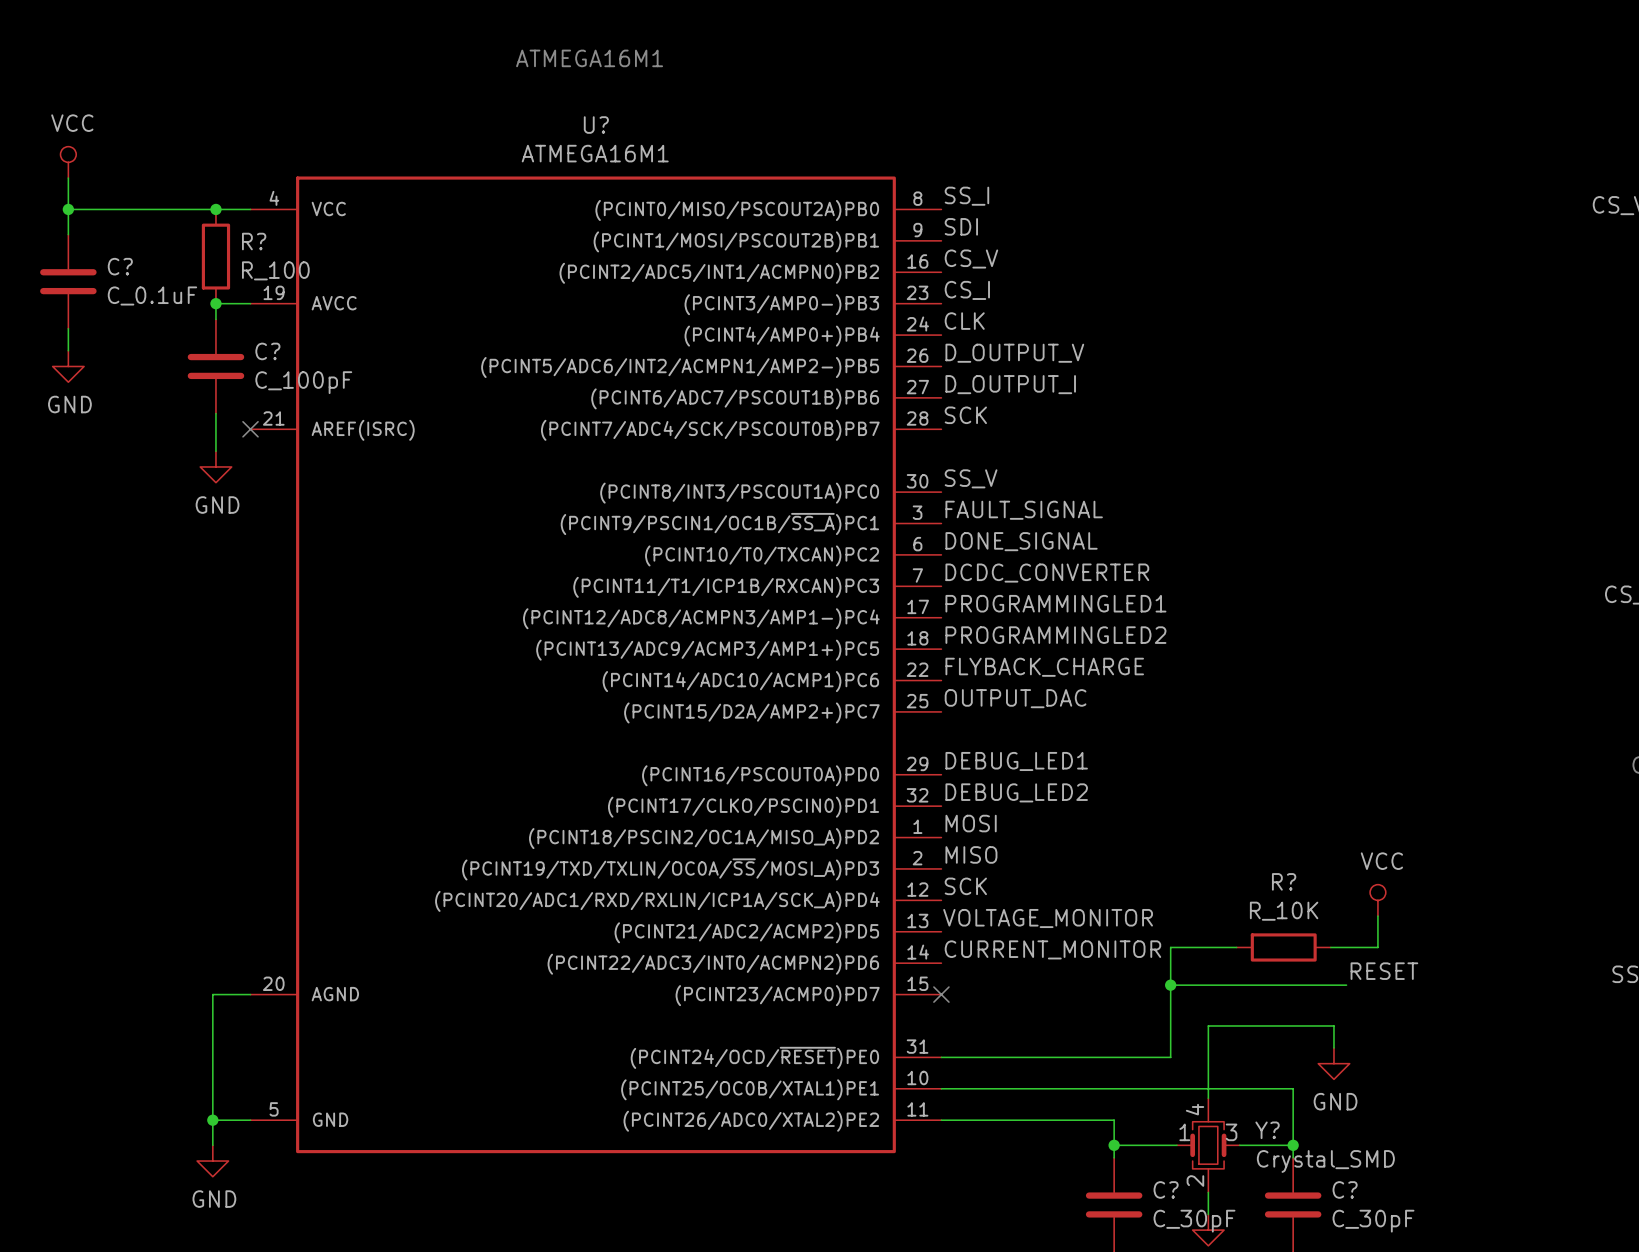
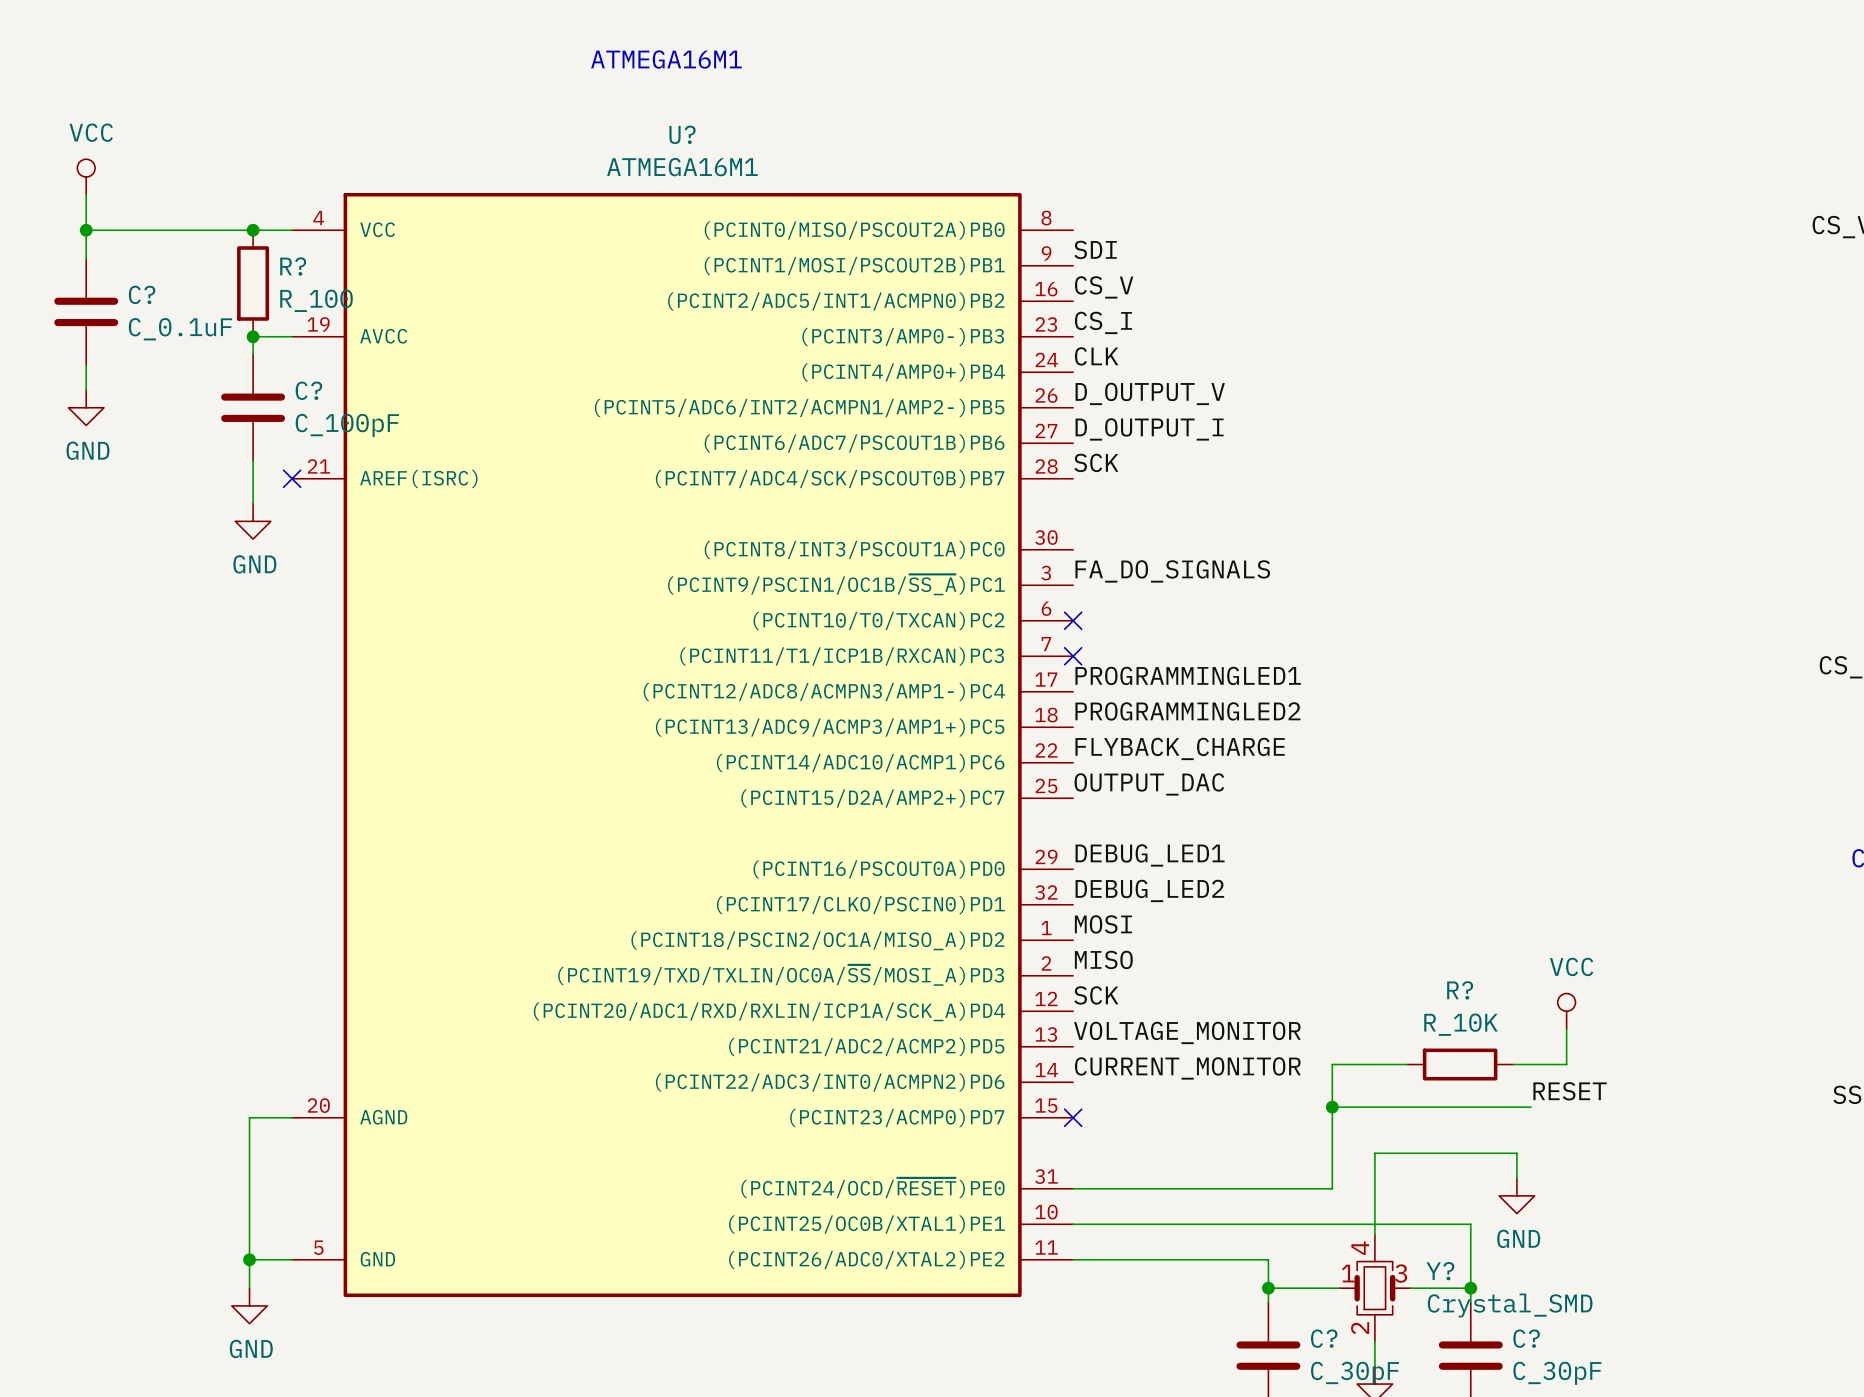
label: SS_I (966, 196) -> none
label: SS_V (971, 478) -> none
label: FAULT_SIGNAL (1024, 510) -> FA_DO_SIGNALS (1172, 571)
label: DONE_SIGNAL (1021, 541) -> none
no-connect mark: none -> (1073, 620)
label: DCDC_CONVERTER (1047, 573) -> none
no-connect mark: none -> (1073, 656)

